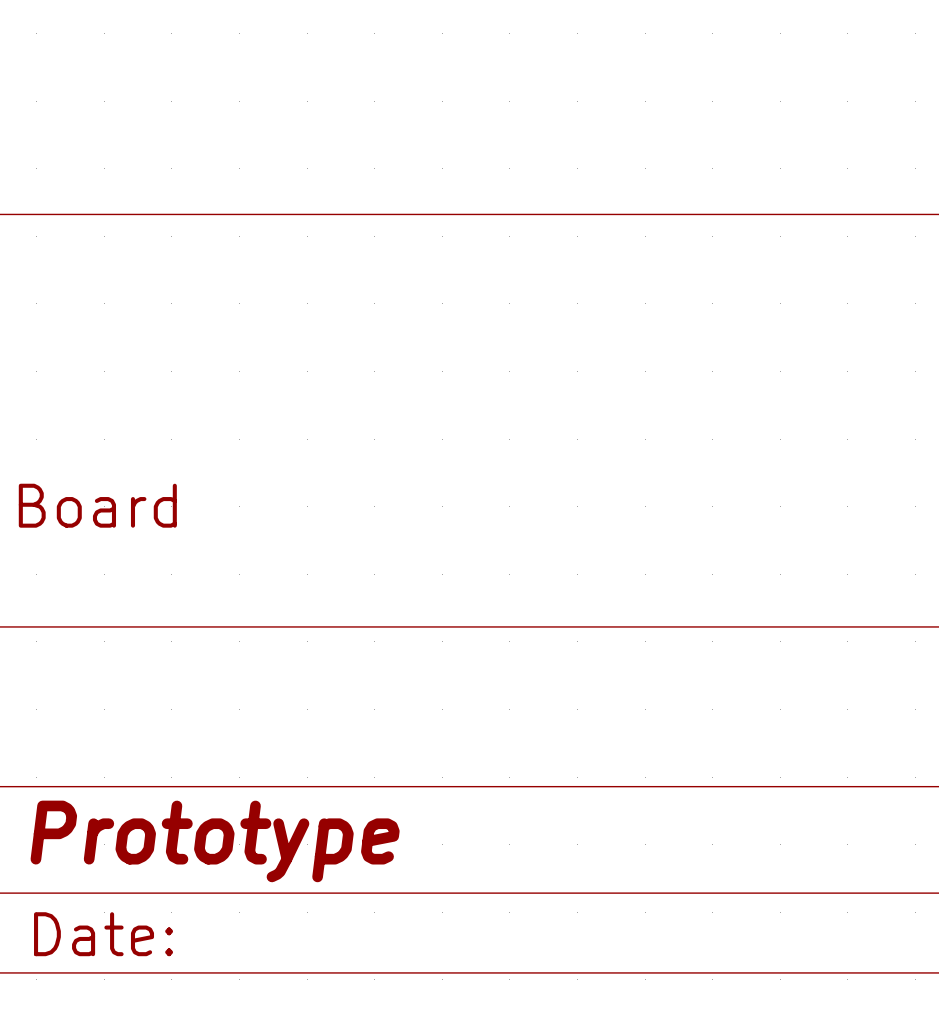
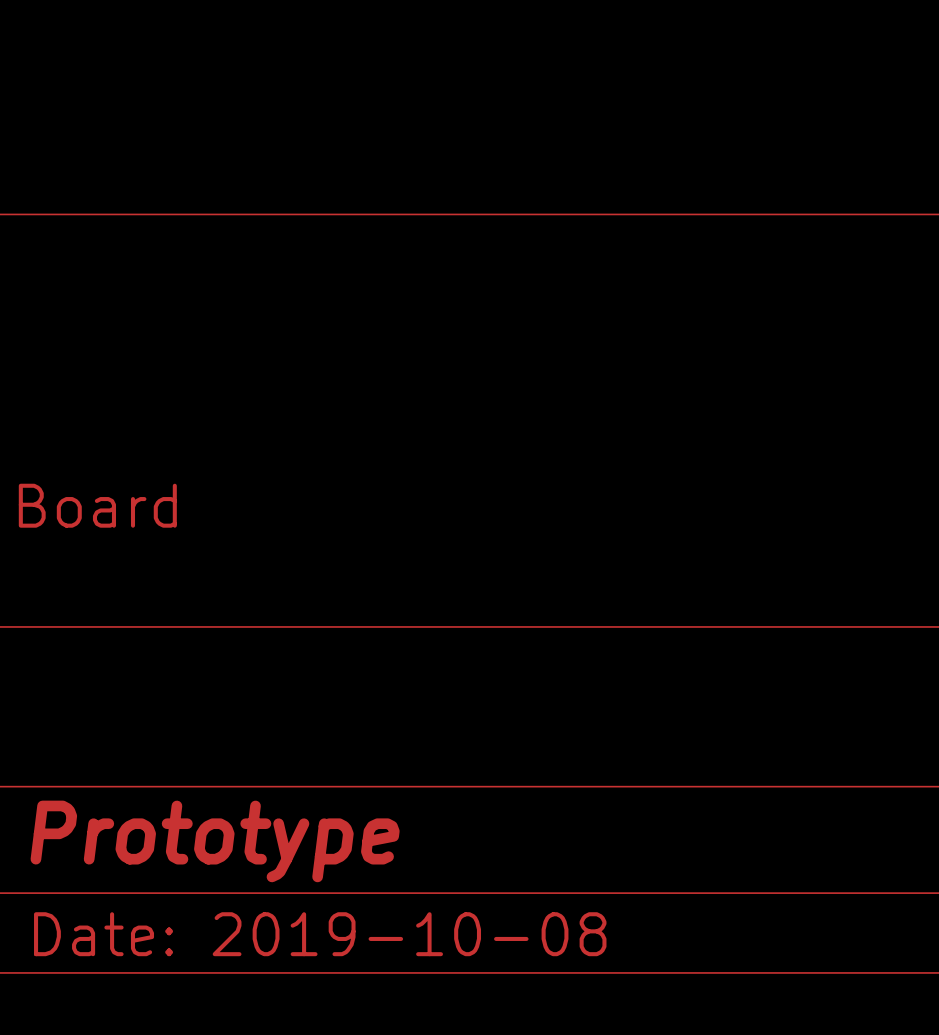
title block: Date: (103, 934) -> Date: 2019-10-08 (320, 934)

